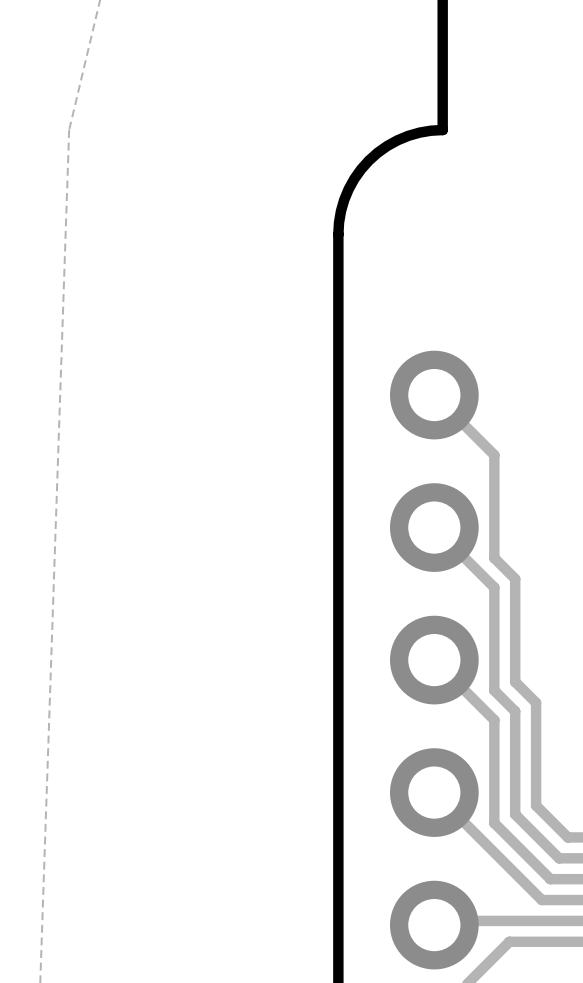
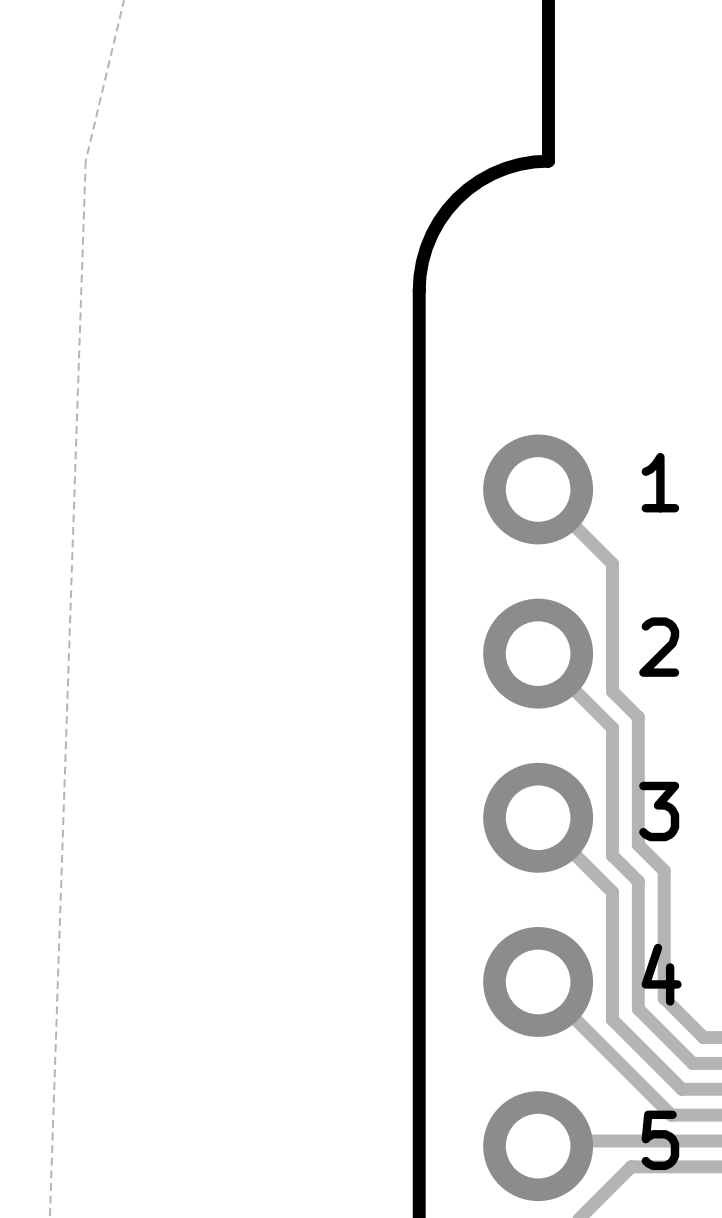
text: none -> 1 (660, 482)
text: none -> 2 (659, 647)
text: none -> 3 (659, 811)
text: none -> 4 (661, 974)
text: none -> 5 (660, 1140)

